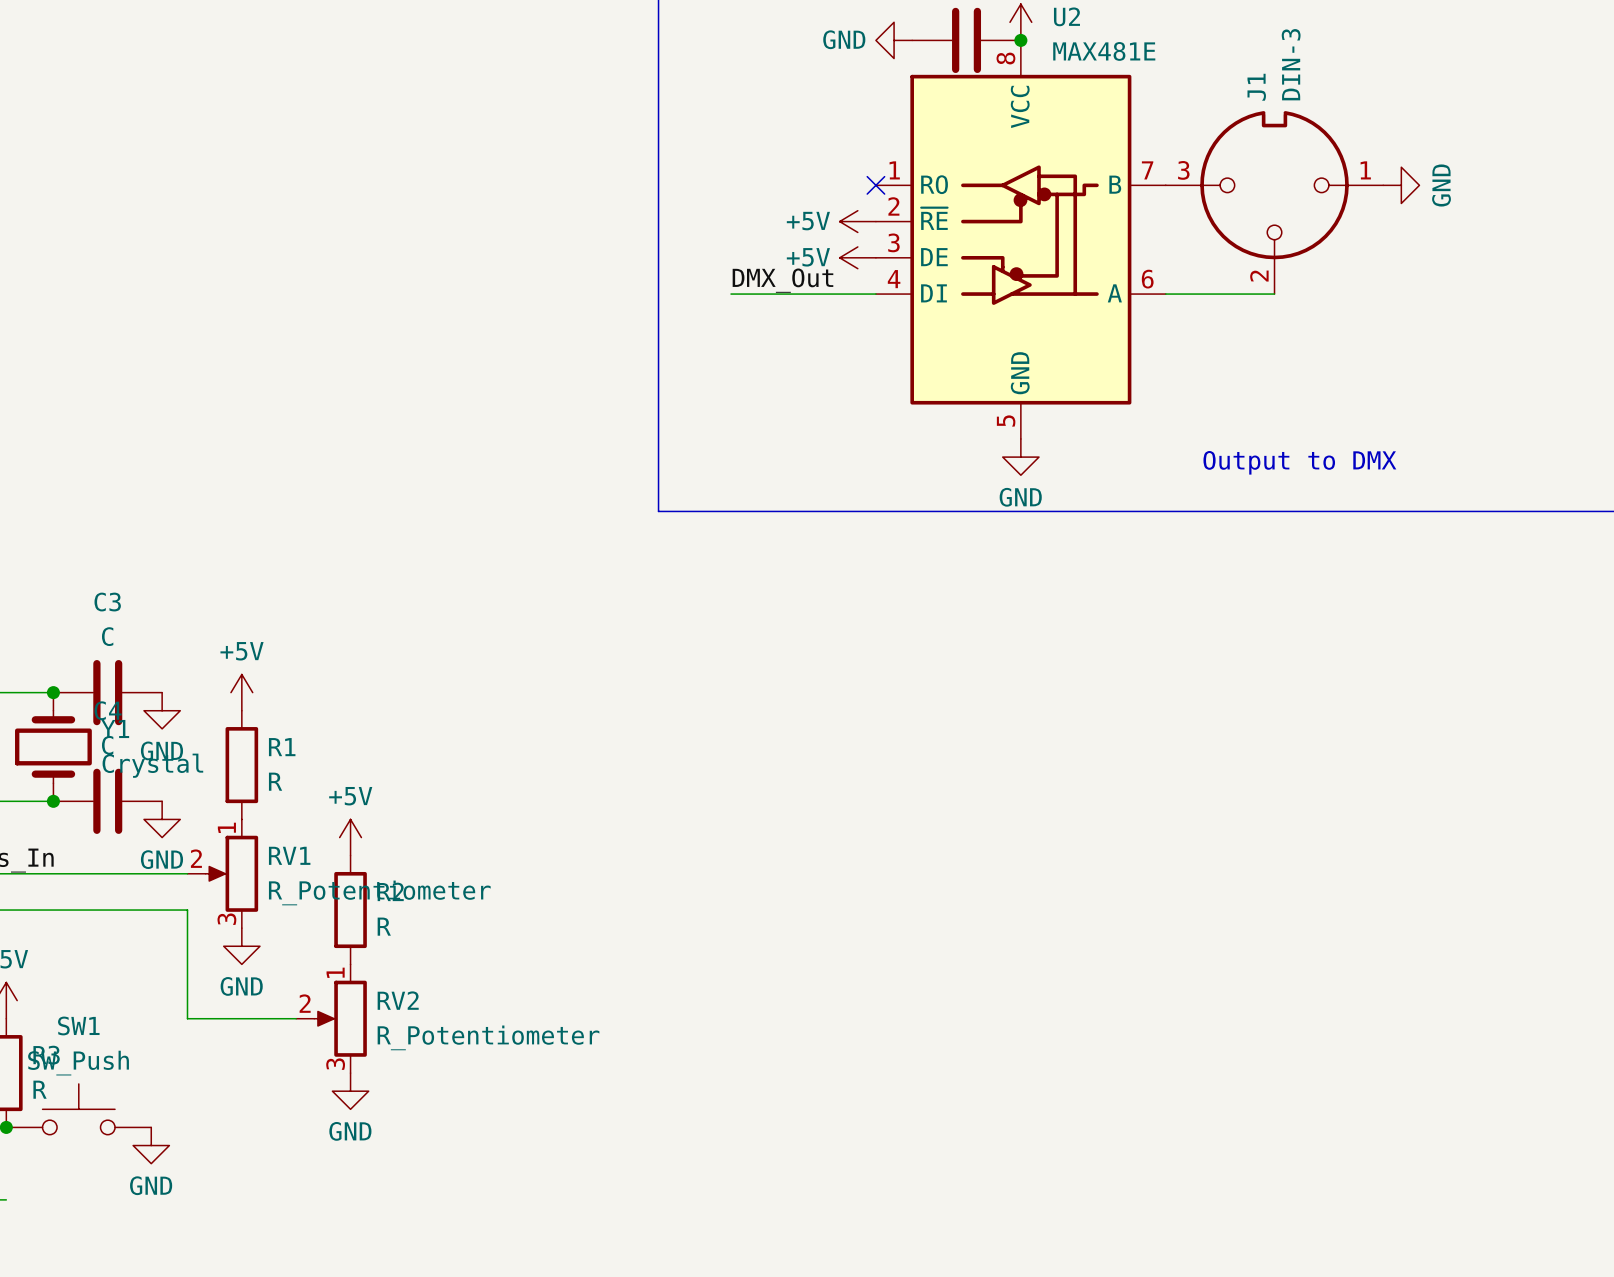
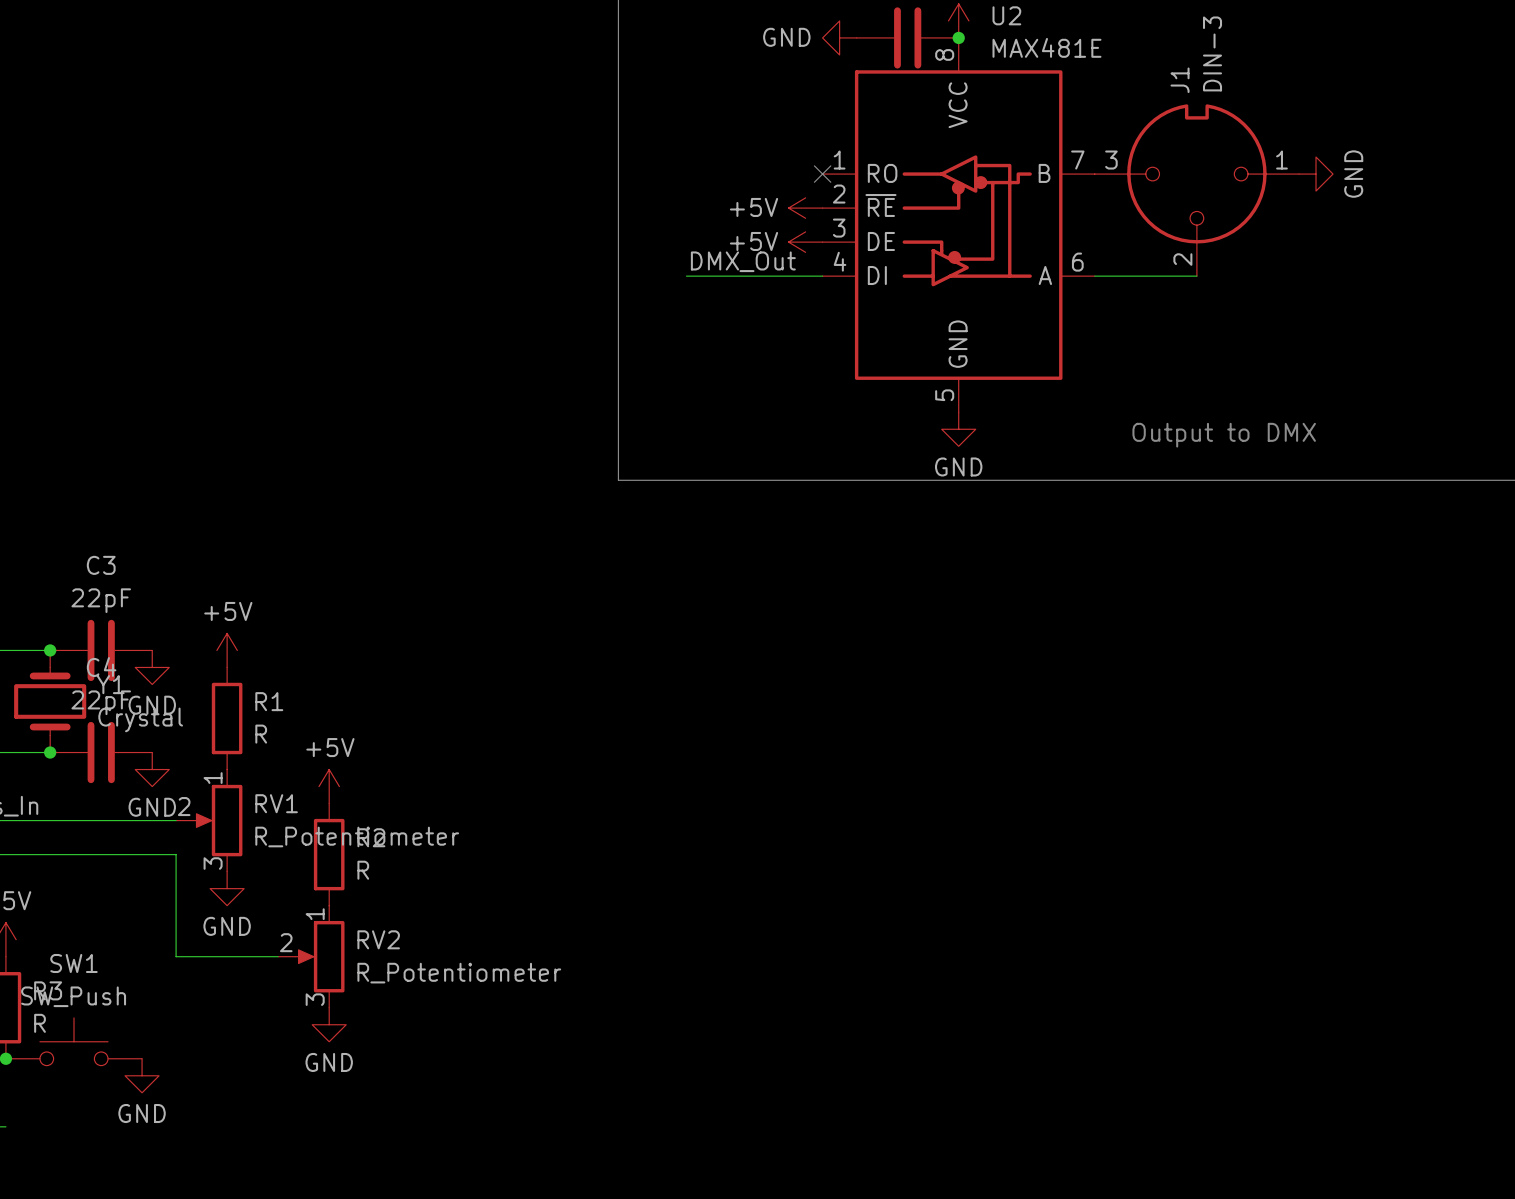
C3 value: C (107, 636) -> 22pF (101, 600)
C4 value: C (107, 745) -> 22pF (101, 702)

